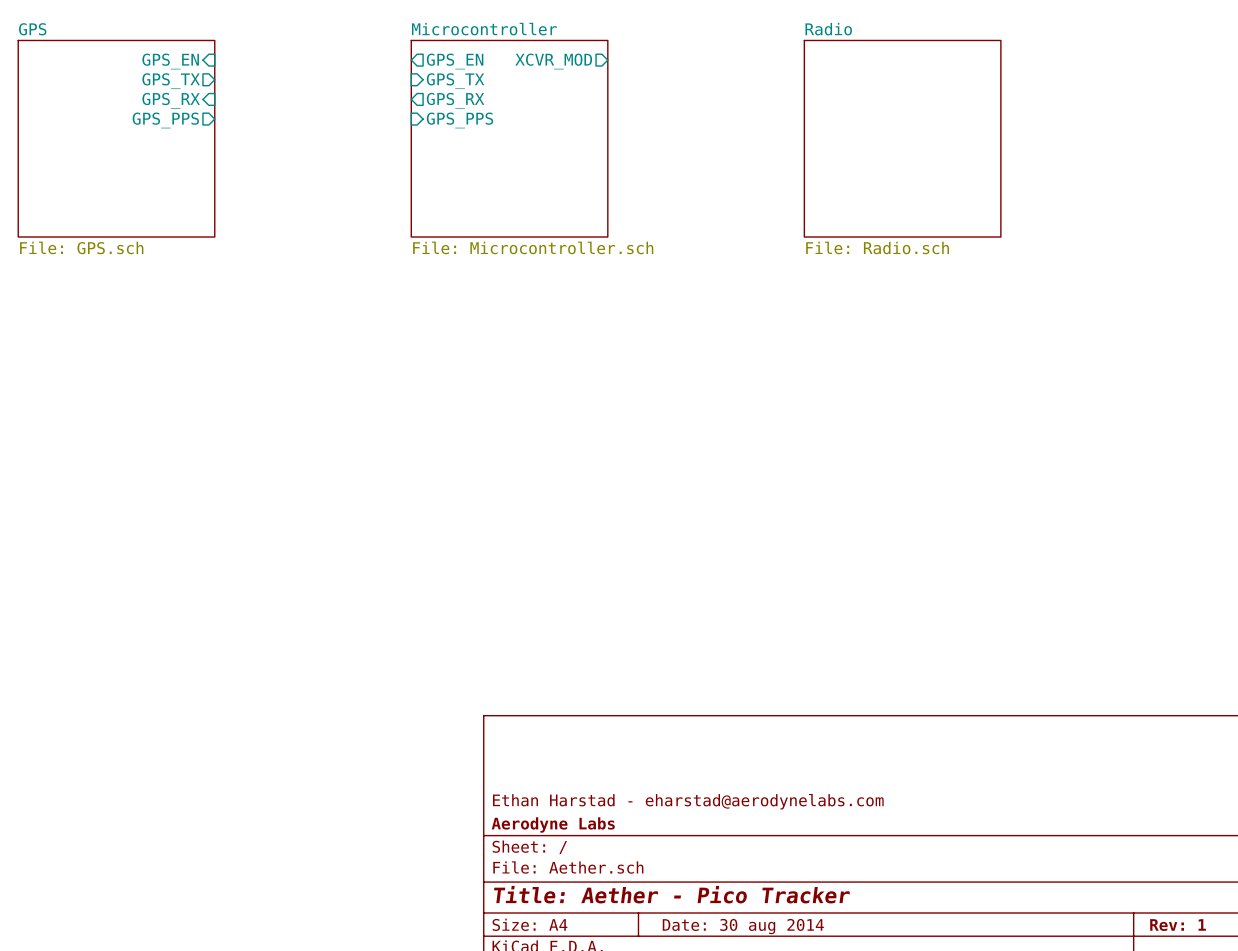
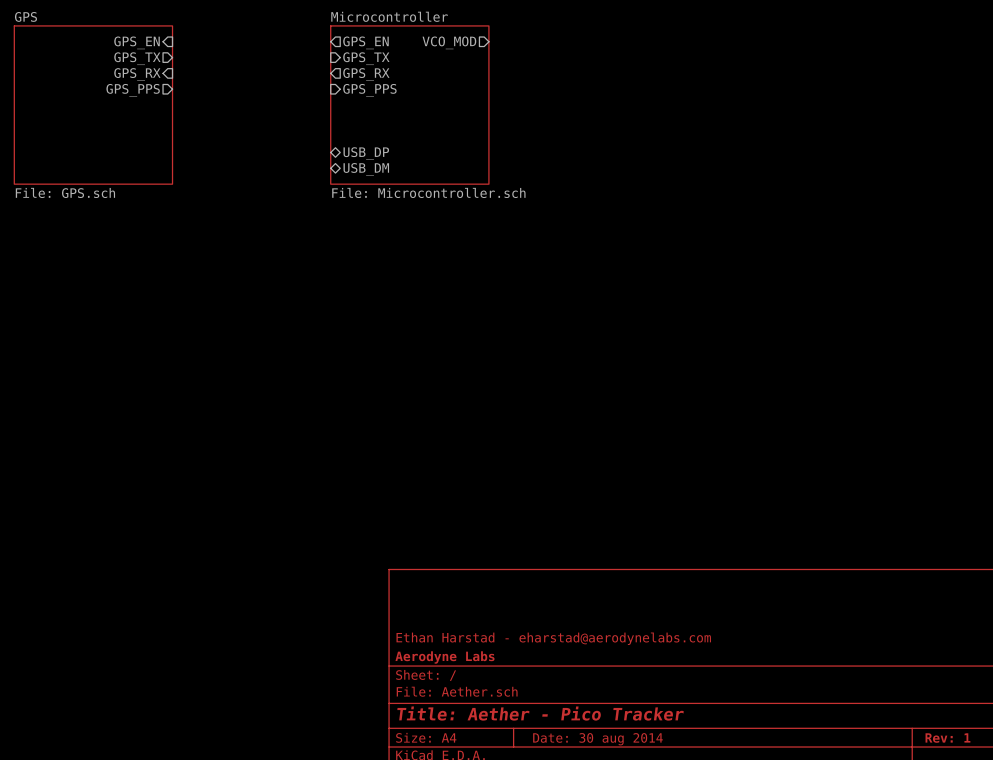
sheet pin: XCVR_MOD (553, 61) -> VCO_MOD (449, 42)
sheet Radio: File: Radio.sch (902, 138) -> none
sheet pin: none -> USB_DP (366, 153)
sheet pin: none -> USB_DM (366, 169)

